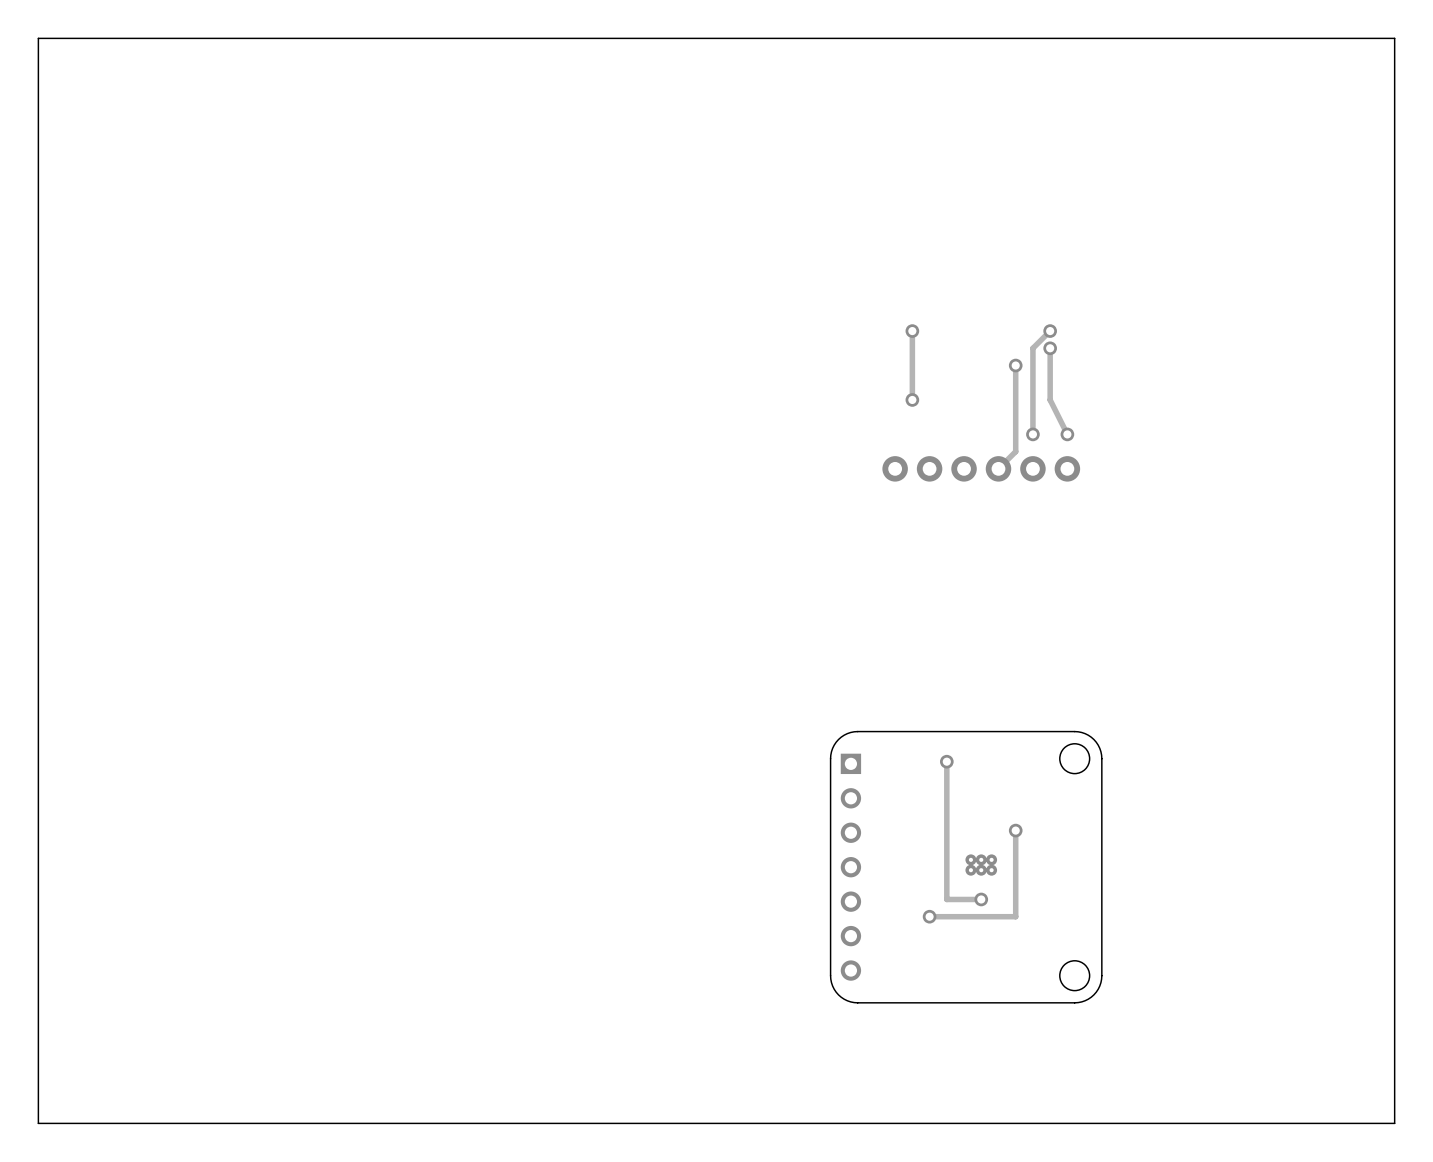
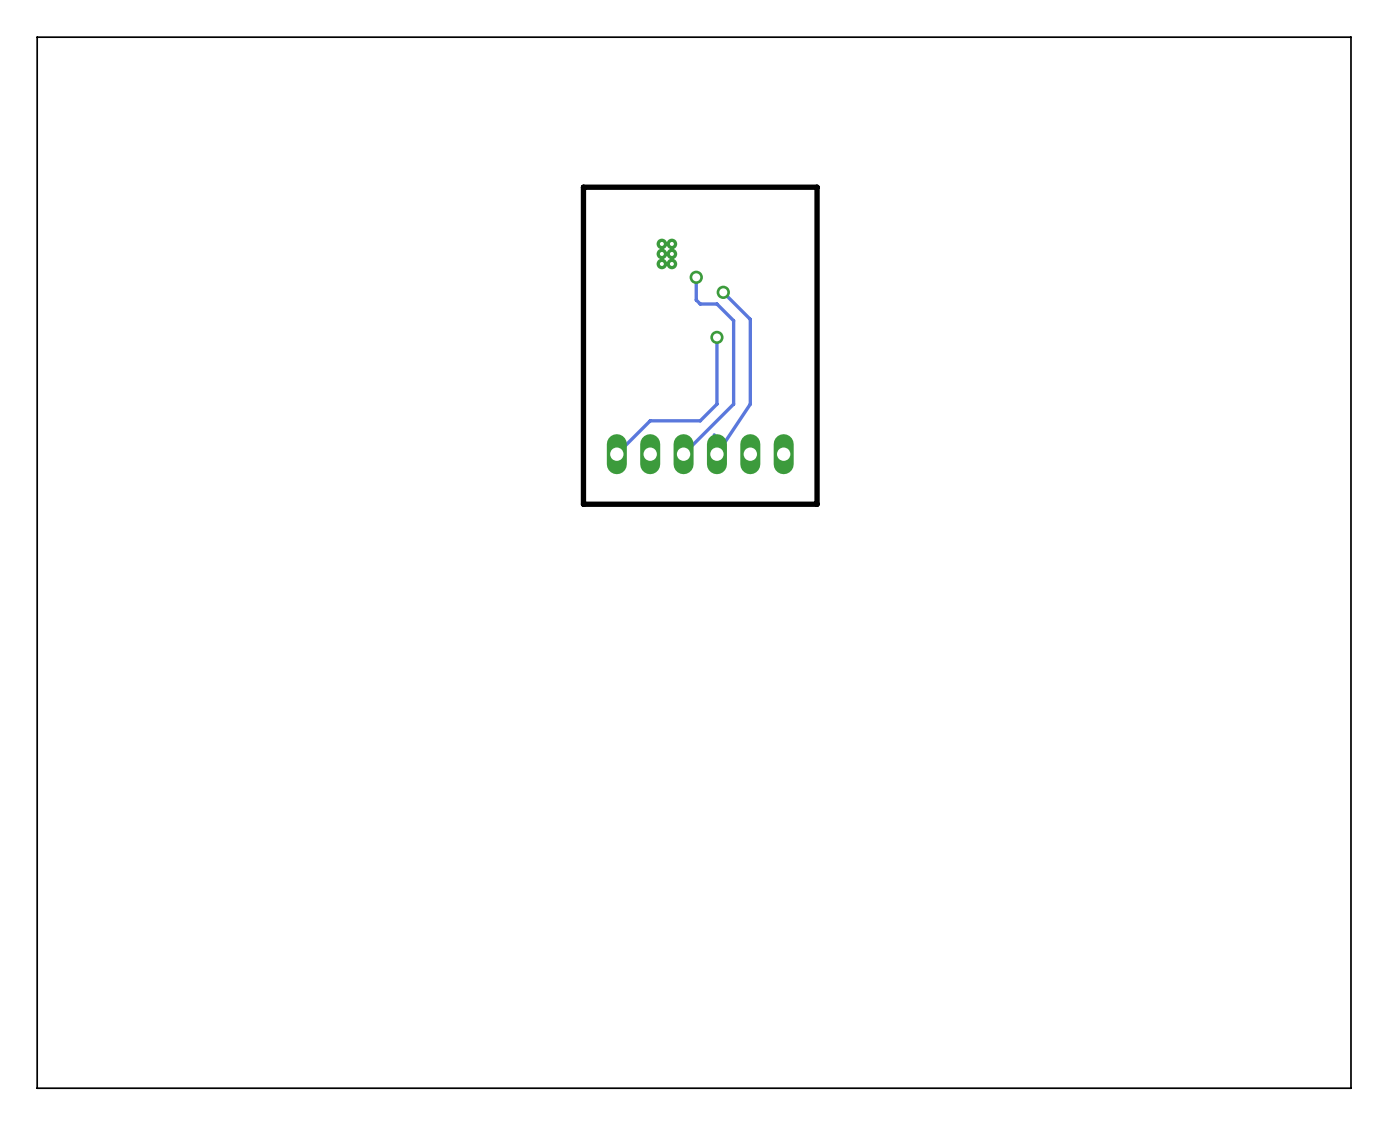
board edge: none -> (817, 187) (583, 187) (583, 504) (817, 504) (817, 187)
part: none -> (666, 253)
track: none -> (696, 277) (696, 300) (700, 304) (716, 304) (733, 320) (733, 404) (683, 454) (684, 451)
via: none -> (696, 277)
track: none -> (723, 292) (750, 319) (750, 404) (716, 454) (714, 434)
via: none -> (723, 292)
track: (912, 331) (912, 399) -> none
via: (912, 331) -> none
track: (1050, 331) (1032, 348) (1032, 434) -> none
via: (1050, 331) -> none
track: none -> (714, 337) (716, 337) (716, 404) (700, 420) (650, 420) (618, 454)
via: none -> (716, 337)
track: (1050, 348) (1050, 399) (1067, 434) -> none
via: (1050, 348) -> none
track: (1015, 365) (1015, 451) (998, 468) -> none
via: (1015, 365) -> none
via: (912, 399) -> none
via: (1032, 434) -> none
via: (1067, 434) -> none
part: none -> (700, 454)
part: (981, 468) -> none
track: (946, 761) (946, 899) (981, 899) -> none
via: (946, 761) -> none
track: (1015, 830) (1015, 916) (929, 916) -> none
via: (1015, 830) -> none
part: (981, 865) -> none
part: (966, 867) -> none
via: (981, 899) -> none
via: (929, 916) -> none

